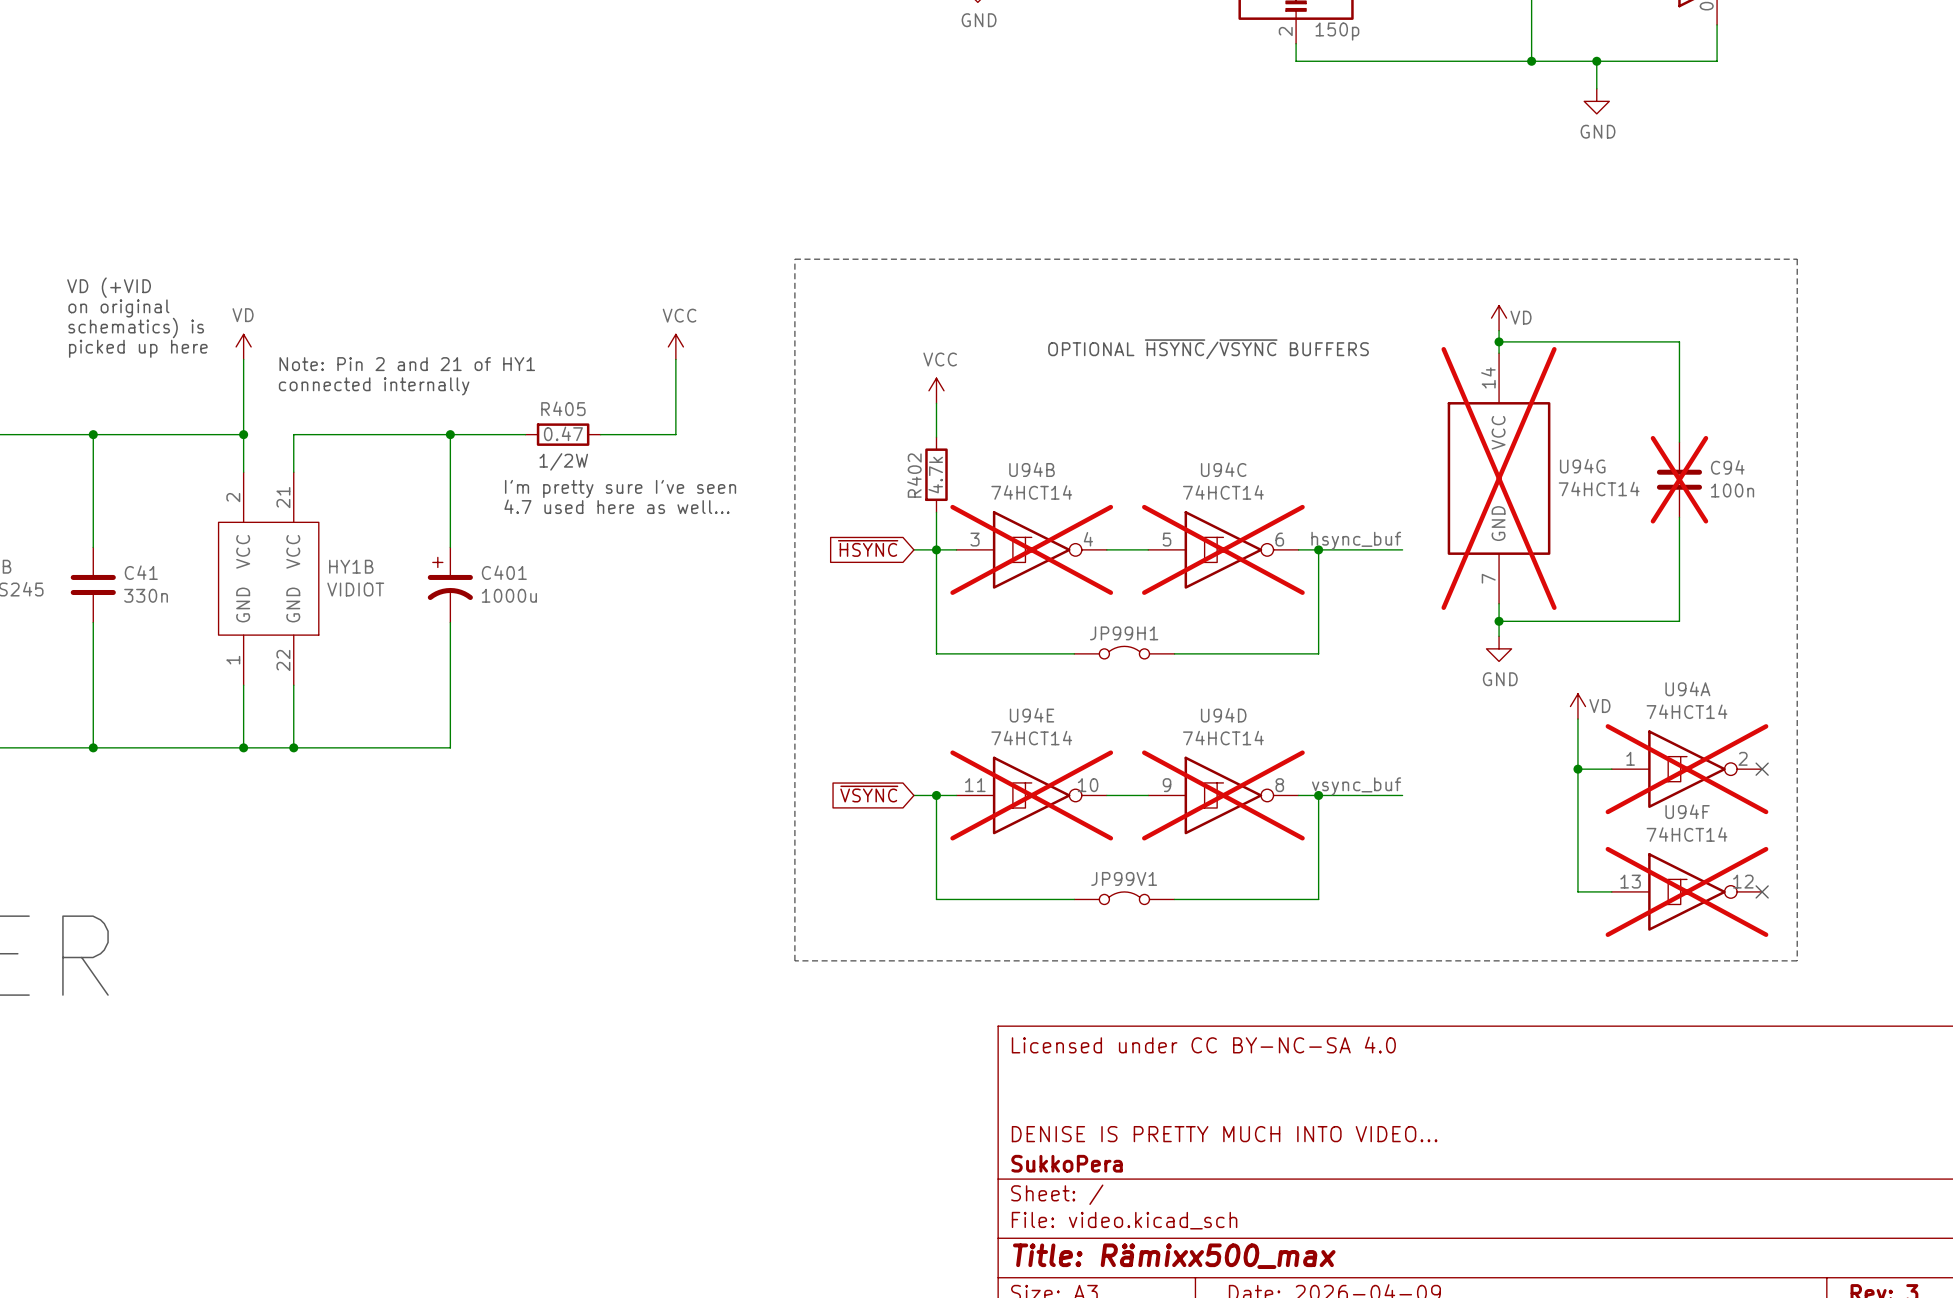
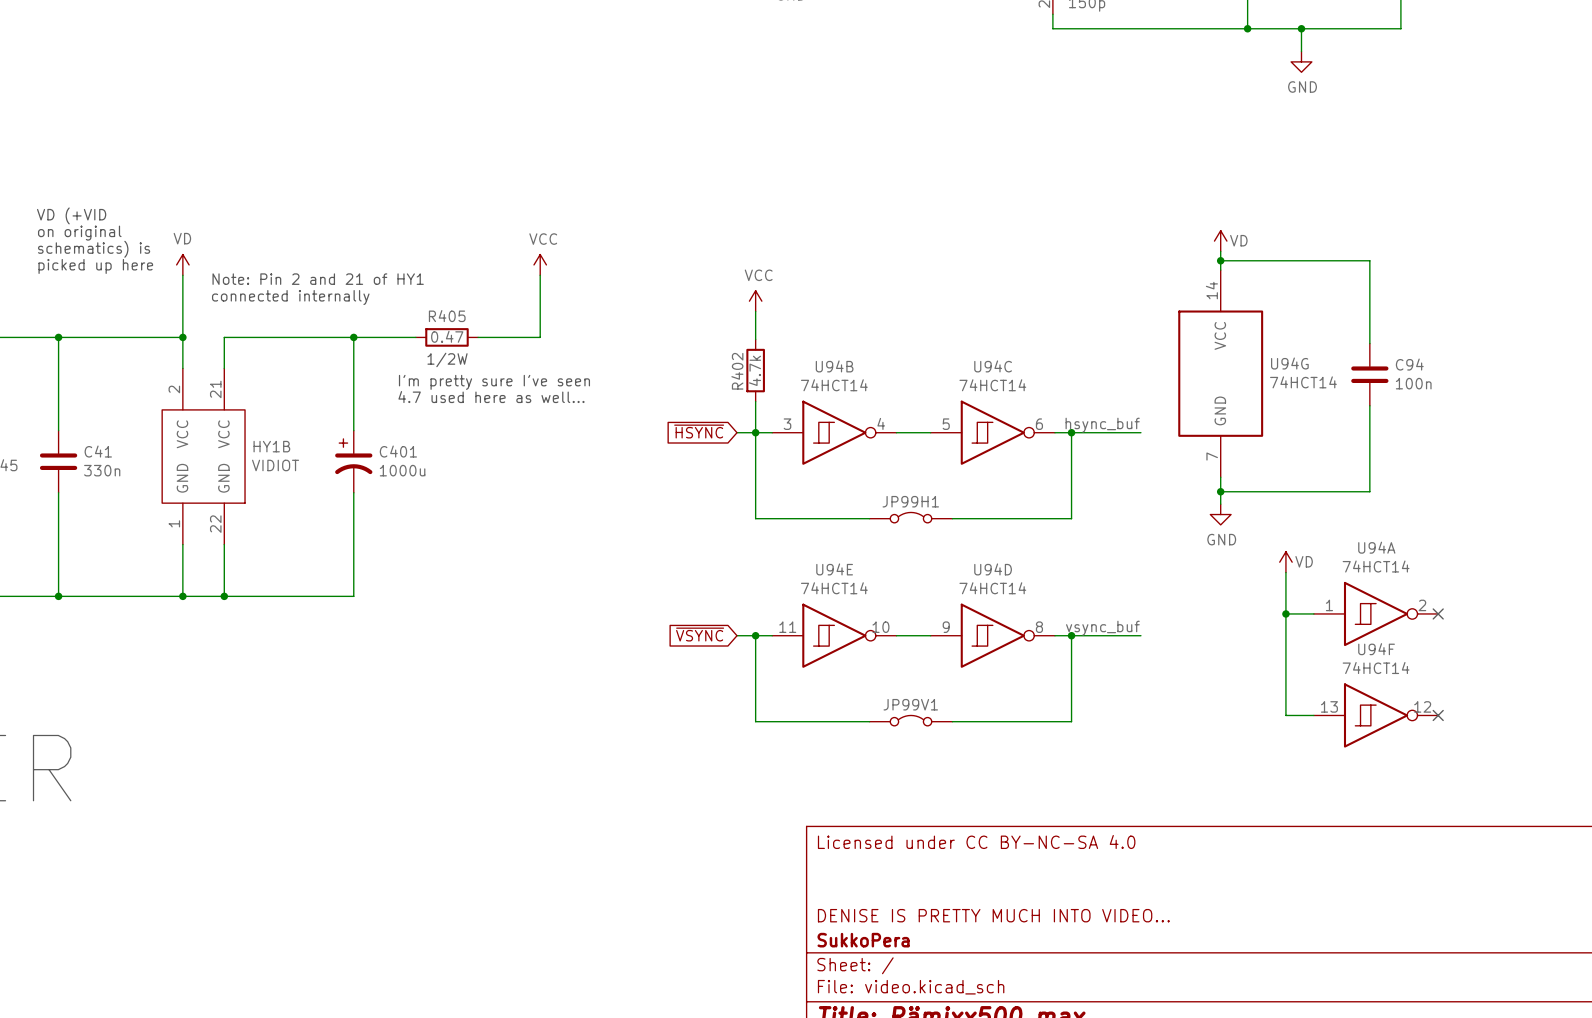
line: (794, 259) (1797, 259) (1797, 960) (794, 960) (794, 259) -> none
text: OPTIONAL ~{HSYNC}/~{VSYNC} BUFFERS (1208, 349) -> none
U94G do-not-place cross: (1499, 478) -> none
C94 do-not-place cross: (1679, 479) -> none
U94B do-not-place cross: (1031, 549) -> none
U94C do-not-place cross: (1223, 549) -> none
U94A do-not-place cross: (1686, 769) -> none
U94E do-not-place cross: (1031, 795) -> none
U94D do-not-place cross: (1223, 795) -> none
U94F do-not-place cross: (1686, 891) -> none

